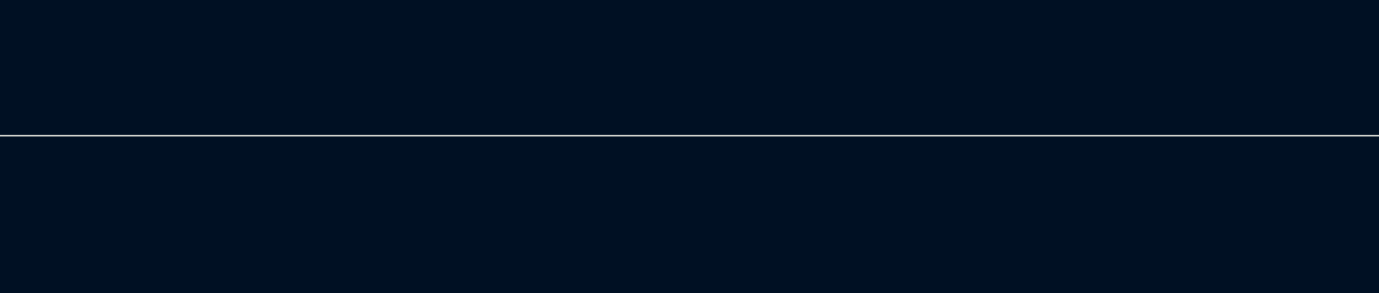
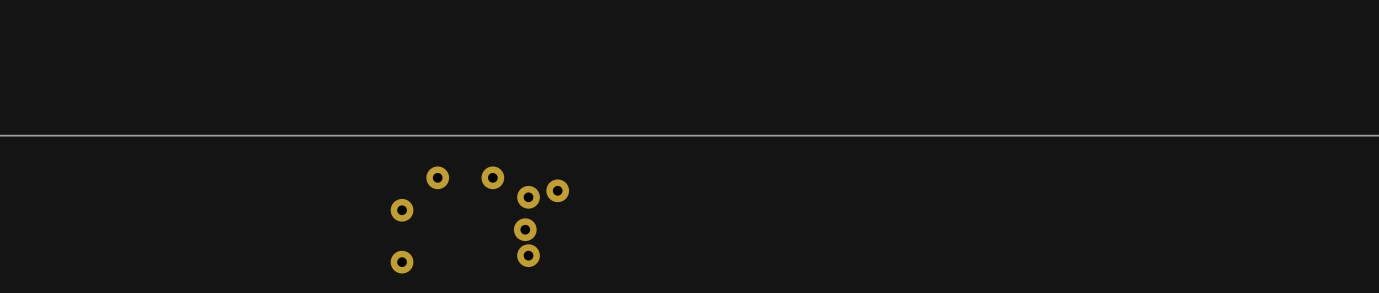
via: none -> (437, 177)
via: none -> (492, 177)
via: none -> (557, 190)
via: none -> (528, 197)
via: none -> (402, 210)
via: none -> (525, 229)
via: none -> (528, 255)
via: none -> (402, 262)

